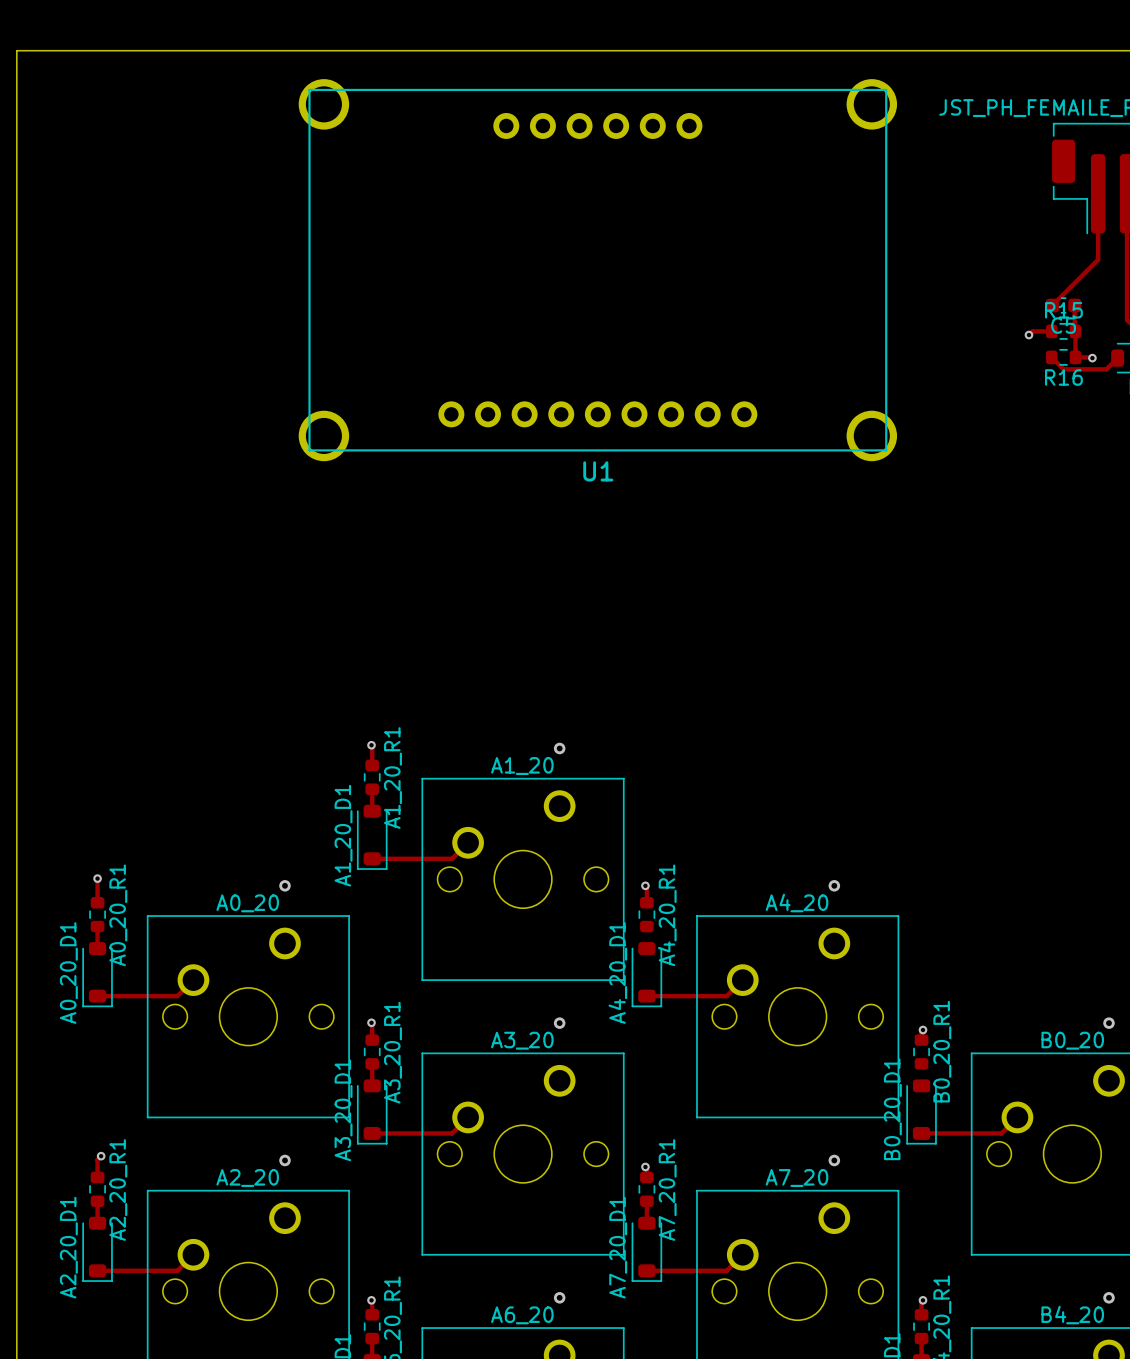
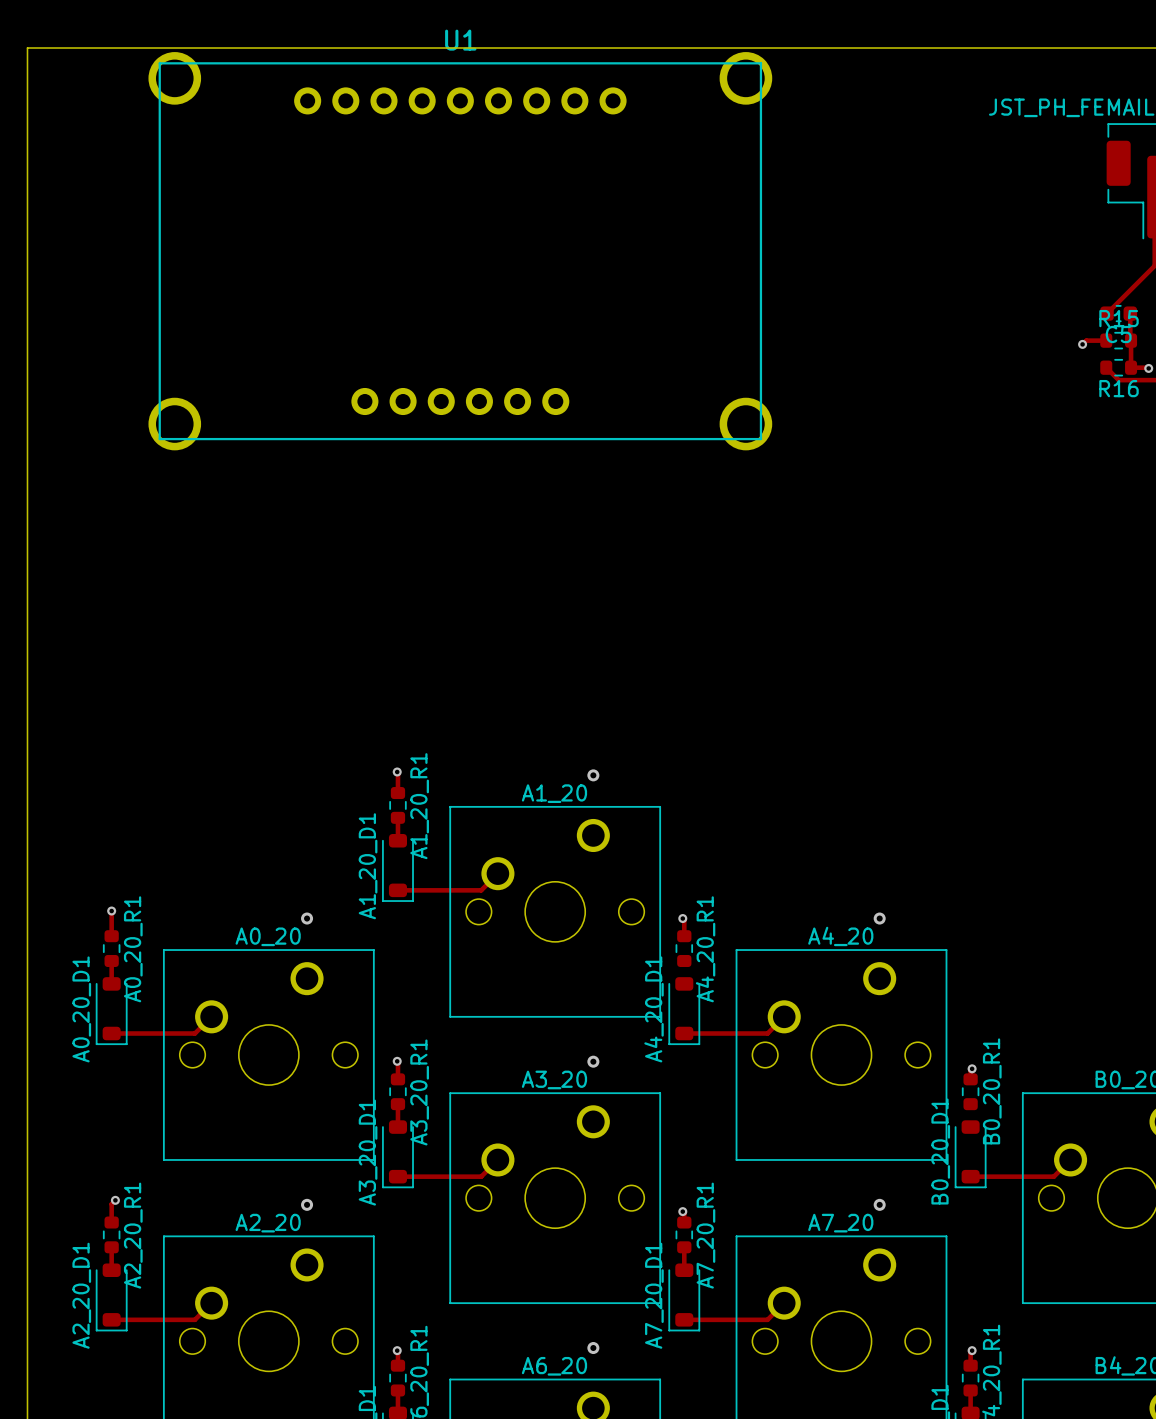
U1 rotation: 0° (597, 270) -> 180° (460, 251)

